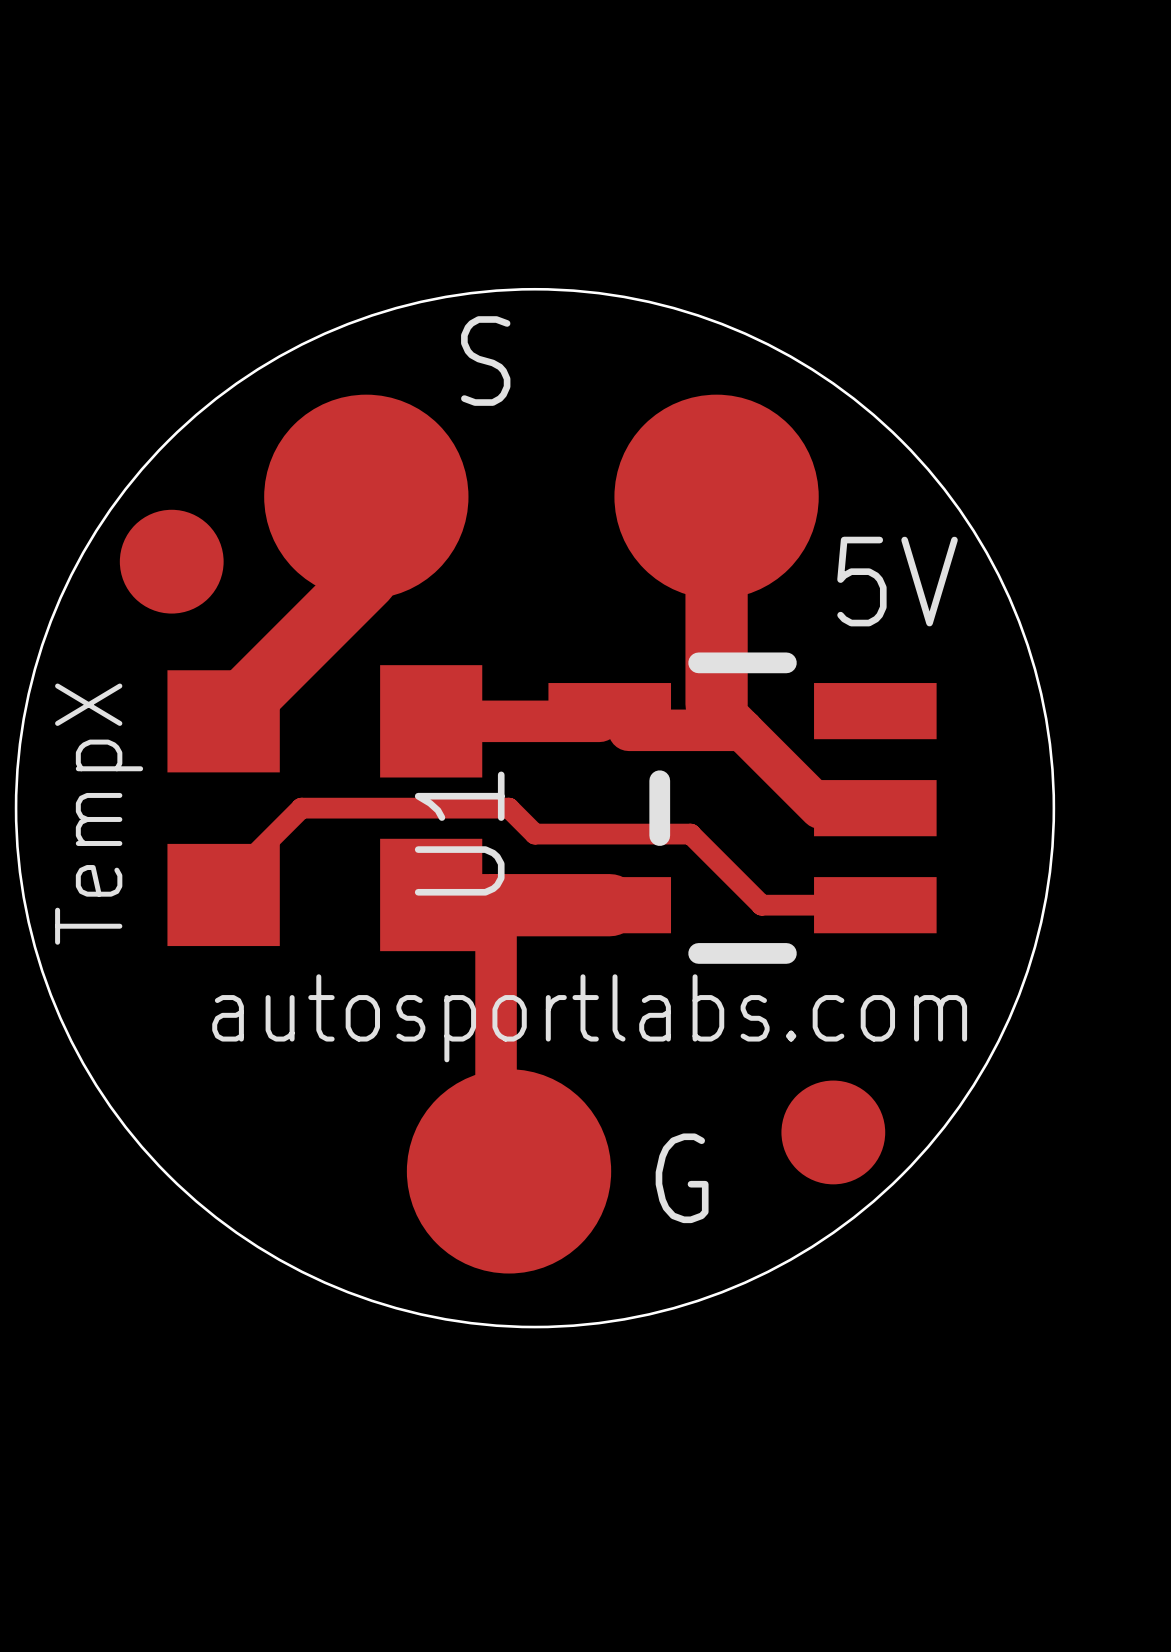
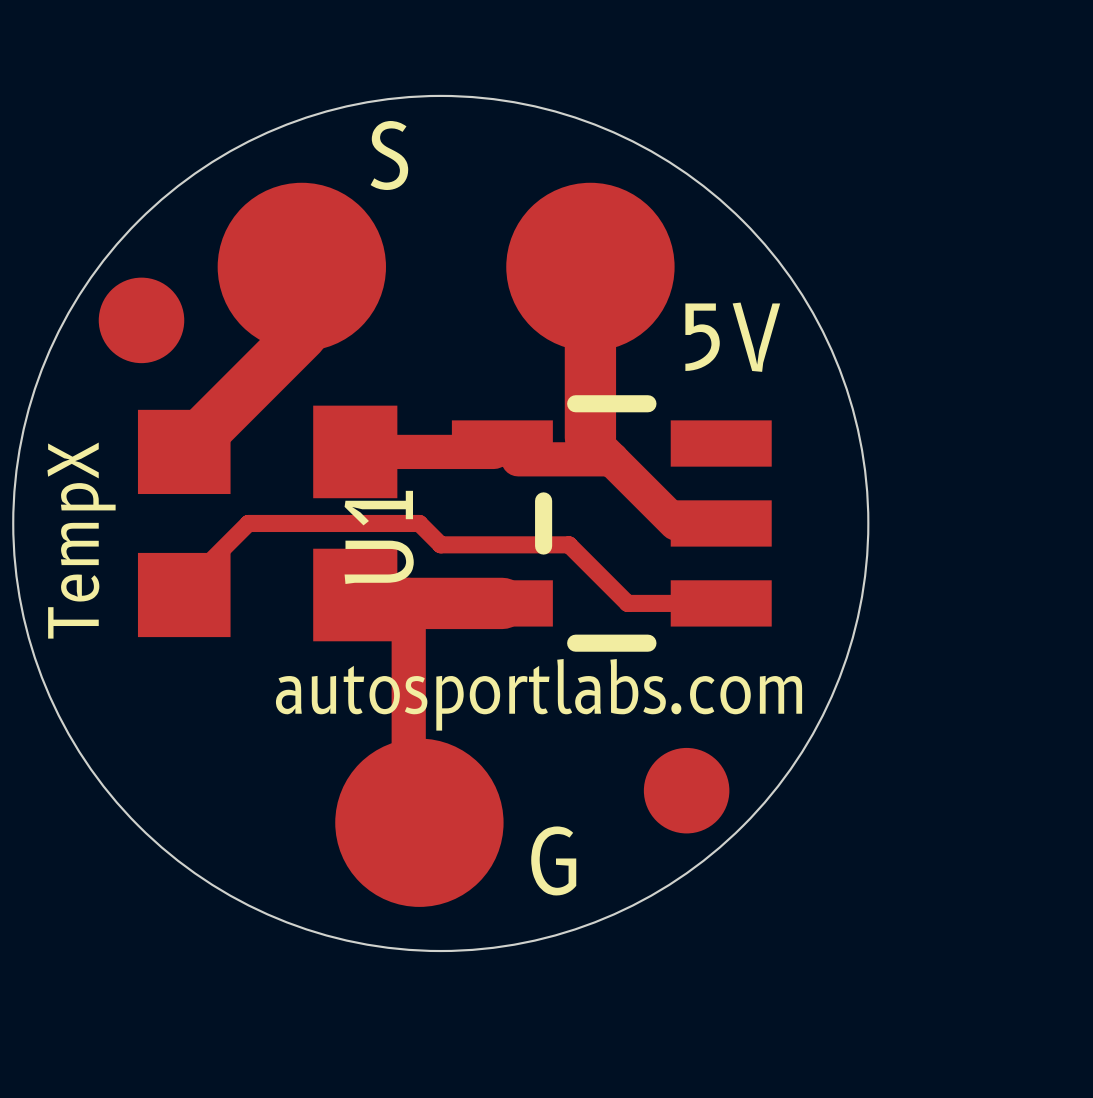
G name position: G (682, 1178) -> G (553, 860)

